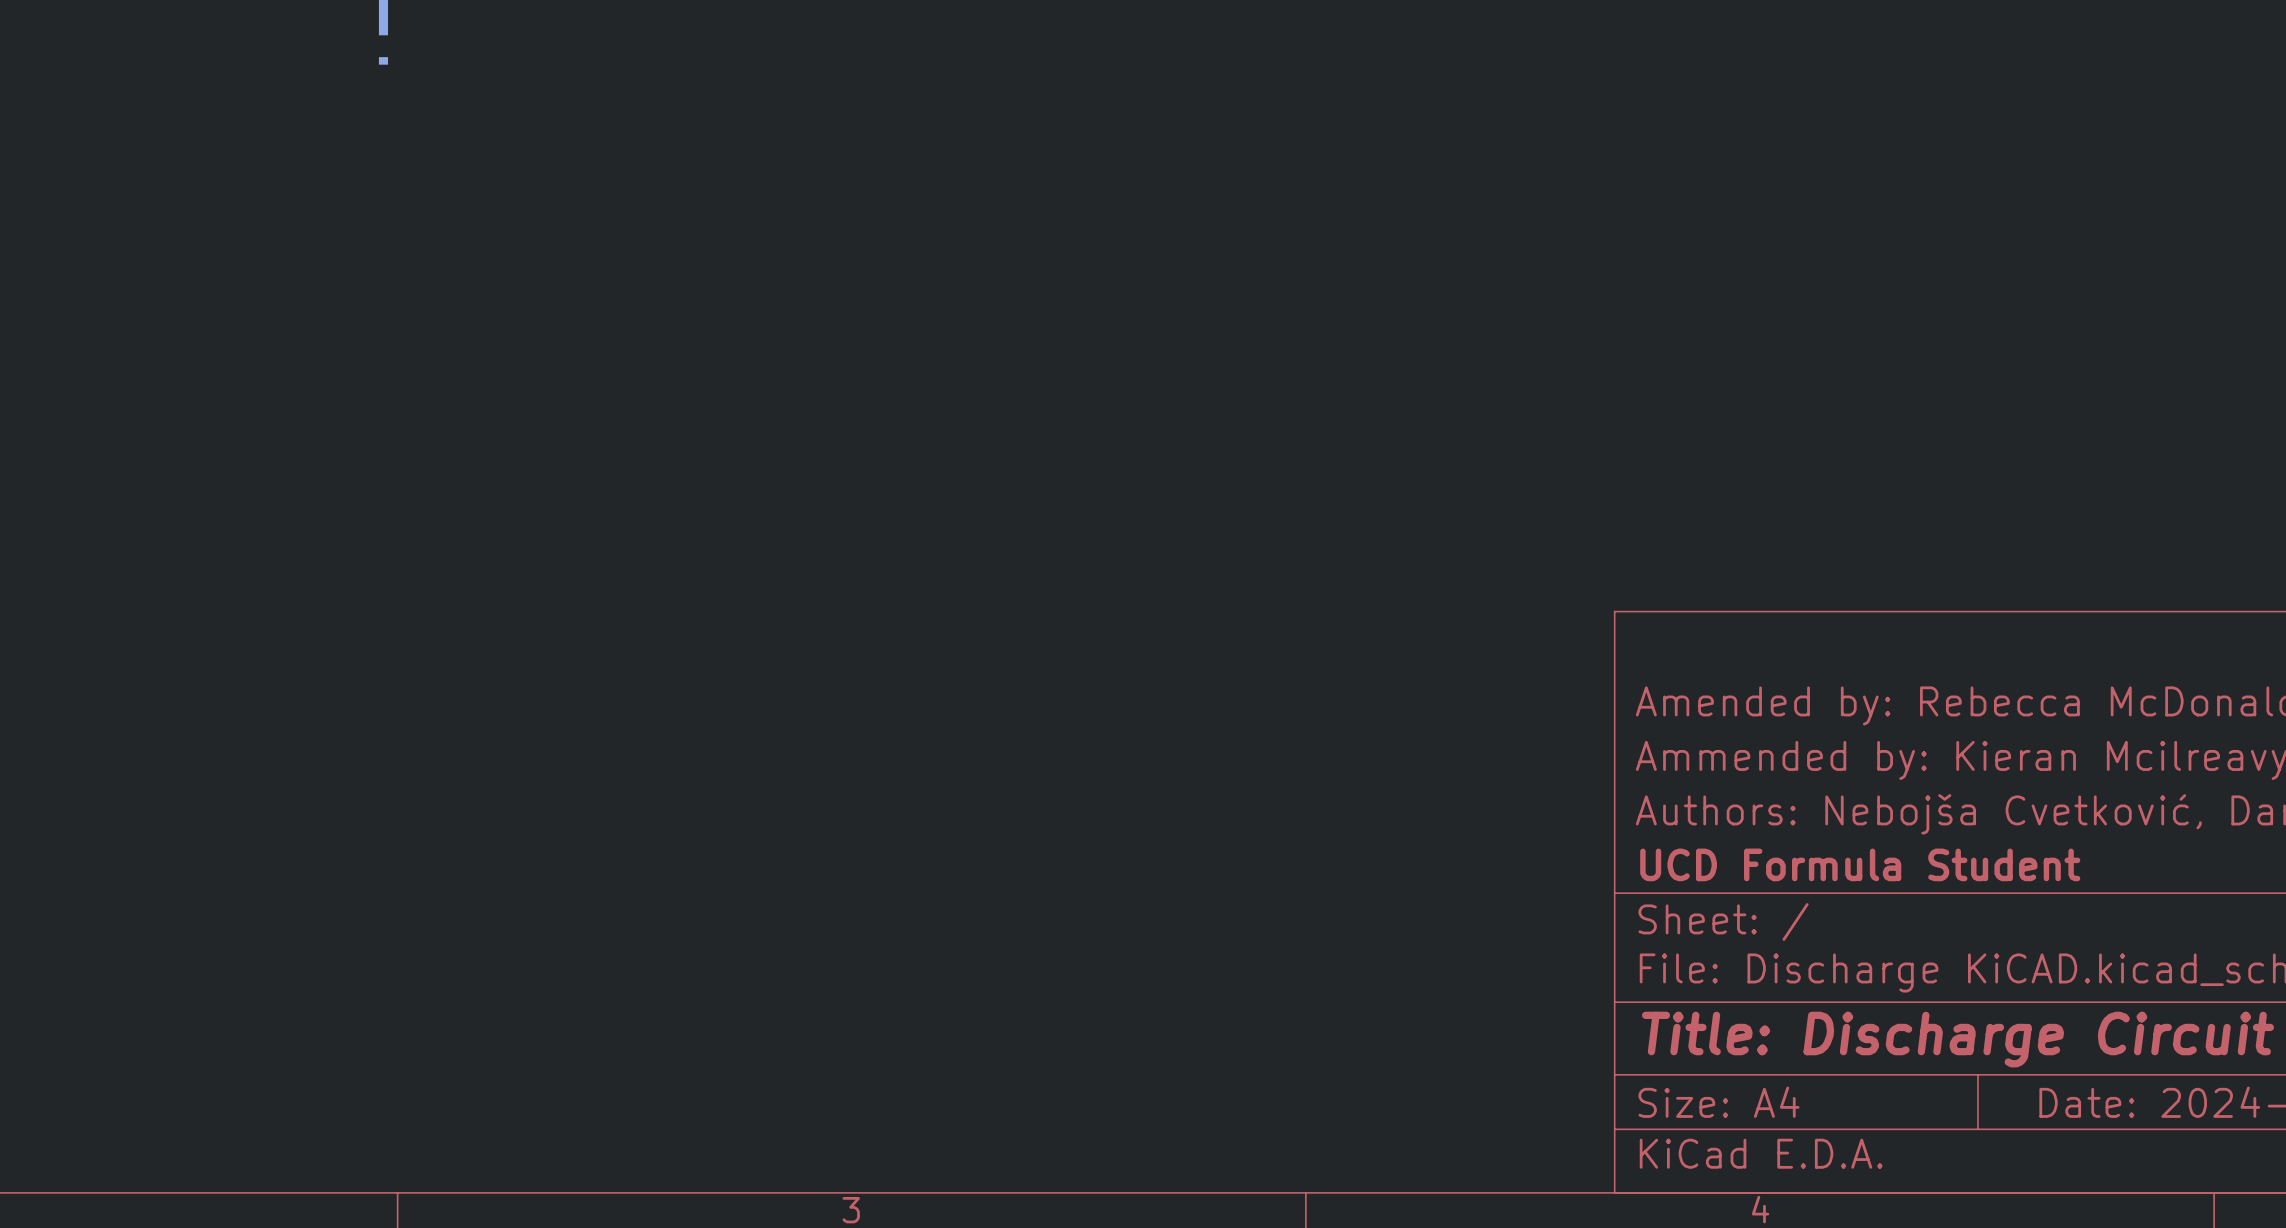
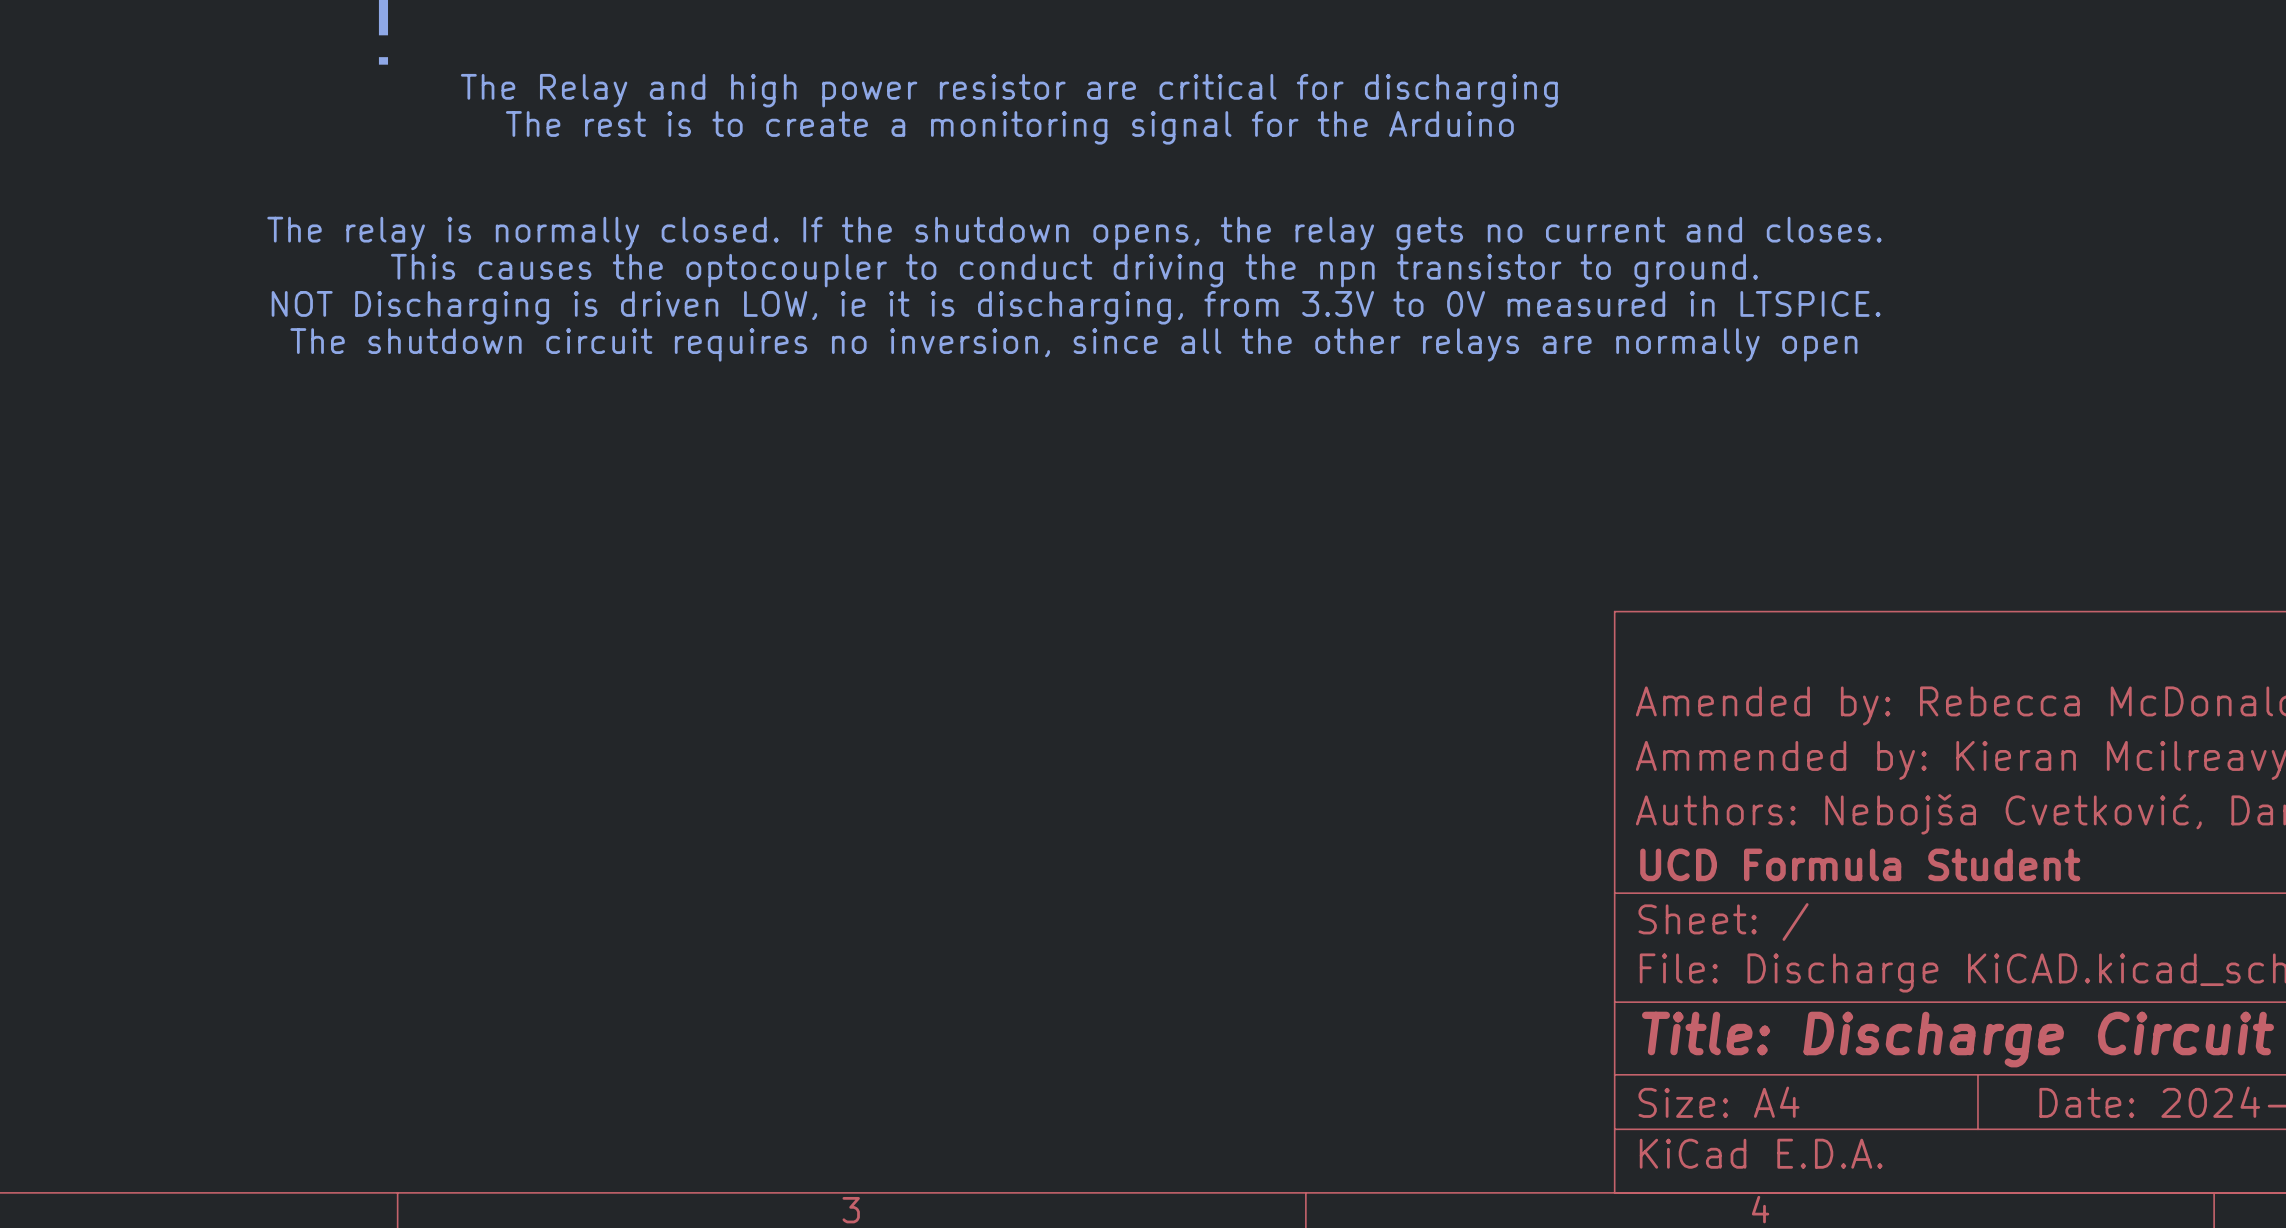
text: none -> The Relay and high power resistor are critical for discharging (1009, 90)
text: none -> The rest is to create a monitoring signal for the Arduino (1009, 127)
text: none -> The relay is normally closed. If the shutdown opens, the relay gets no current and closes. (1074, 233)
text: none -> This causes the optocoupler to conduct driving the npn transistor to ground. (1074, 270)
text: none -> NOT Discharging is driven LOW, ie it is discharging, from 3.3V to 0V measured in LTSPICE. (1076, 307)
text: none -> The shutdown circuit requires no inversion, since all the other relays are normally open (1073, 344)

